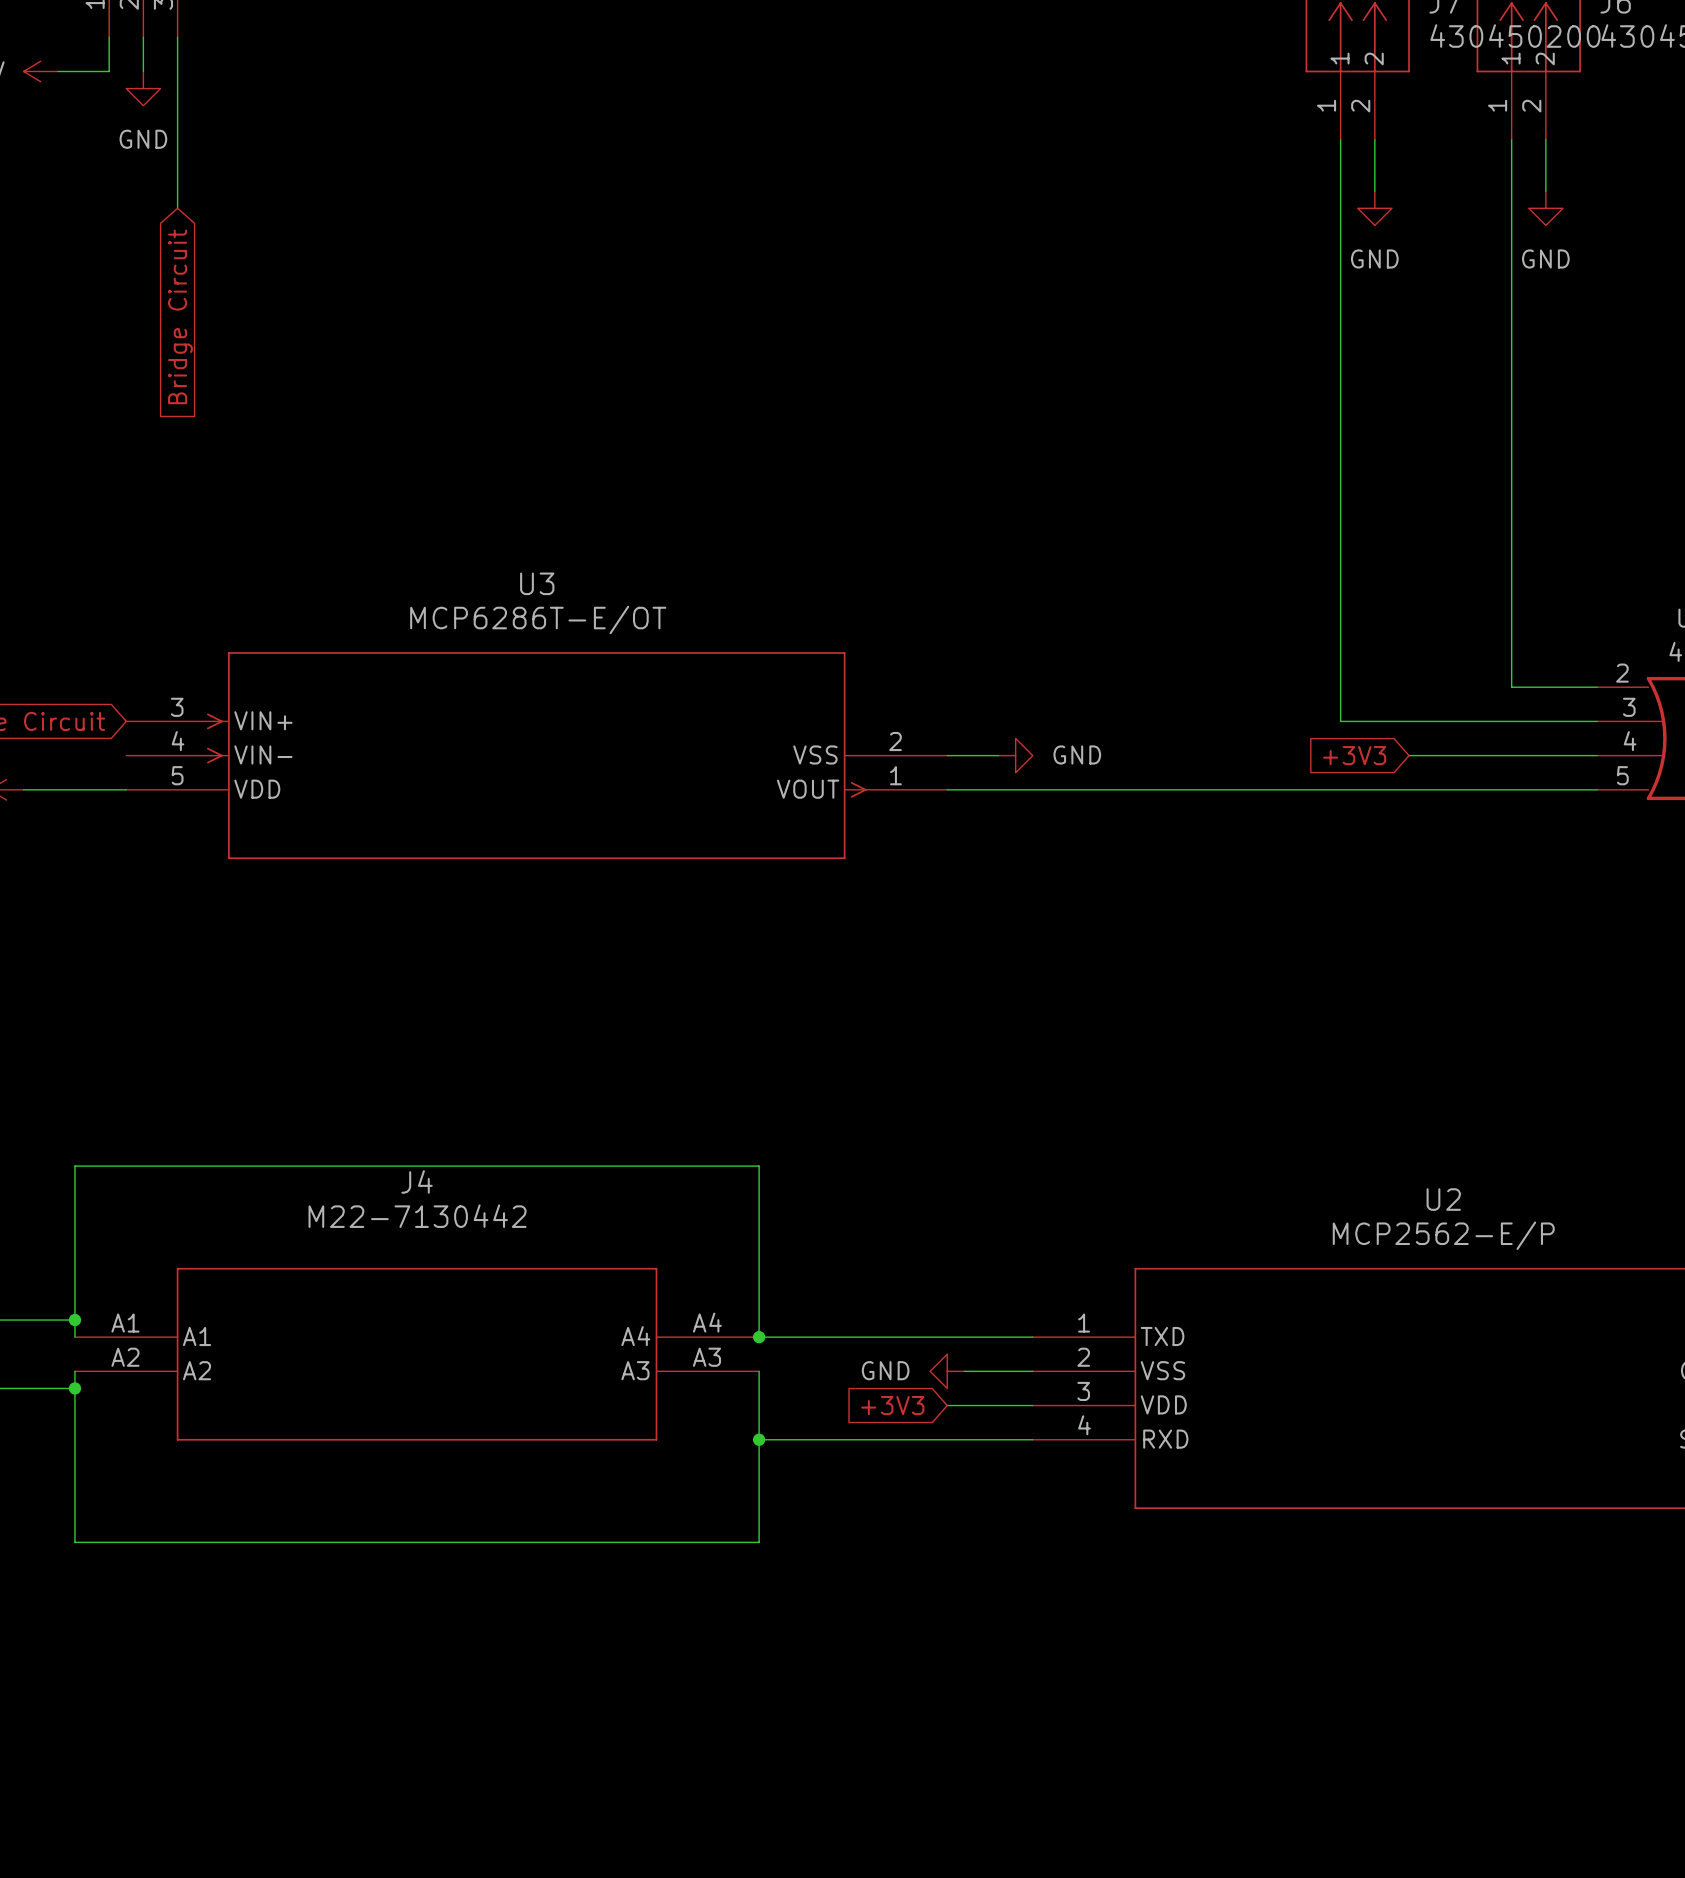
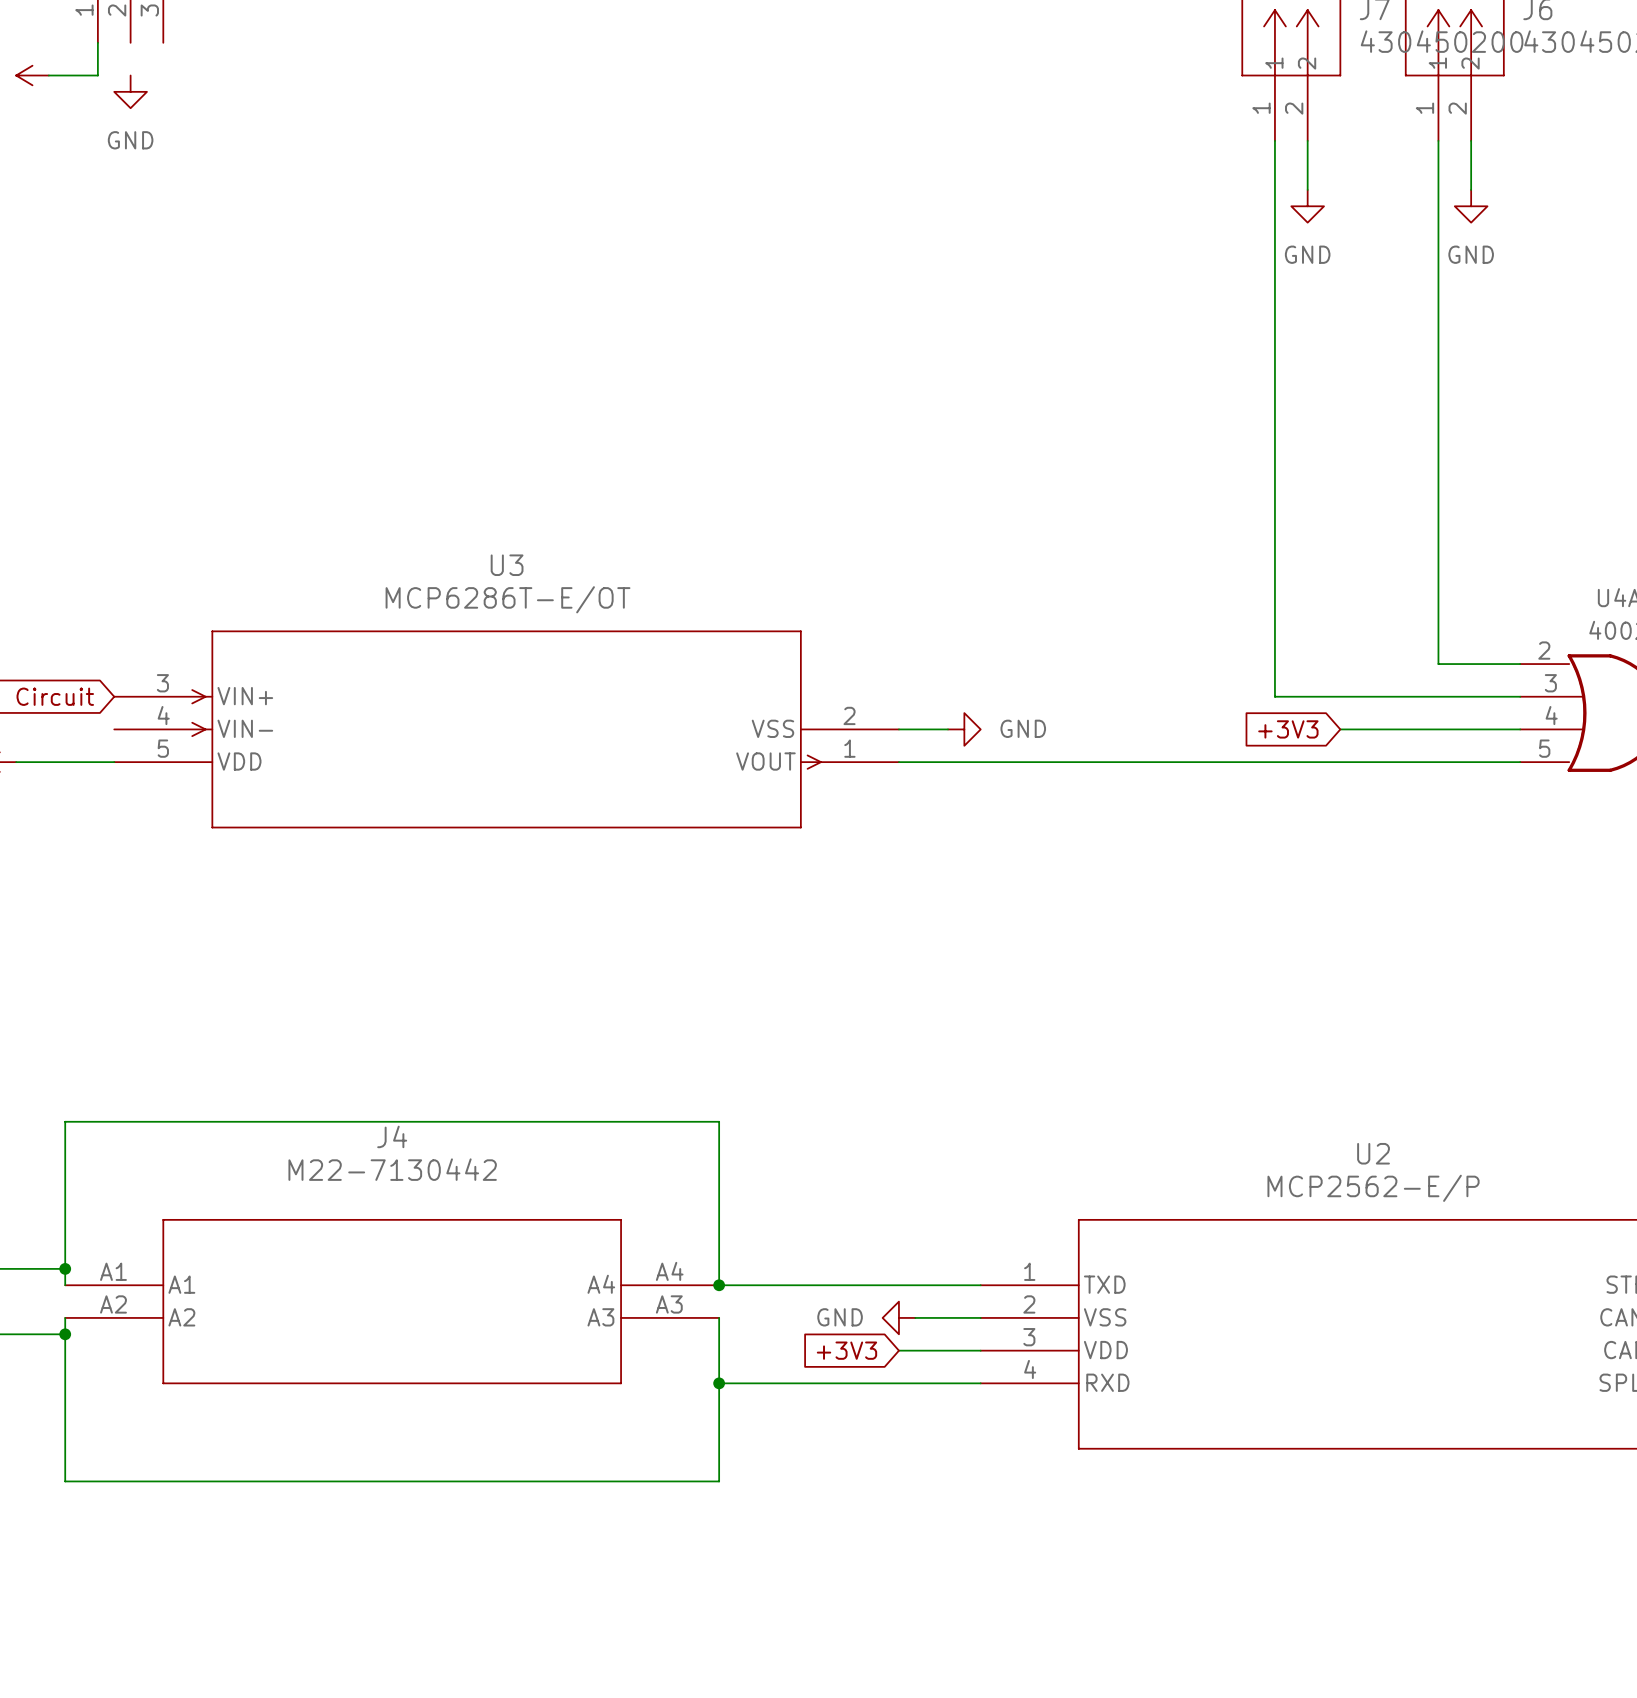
wire: (143, 37) (143, 71) -> none
wire: (177, 37) (177, 208) -> none
global label: Bridge Circuit (180, 316) -> none

